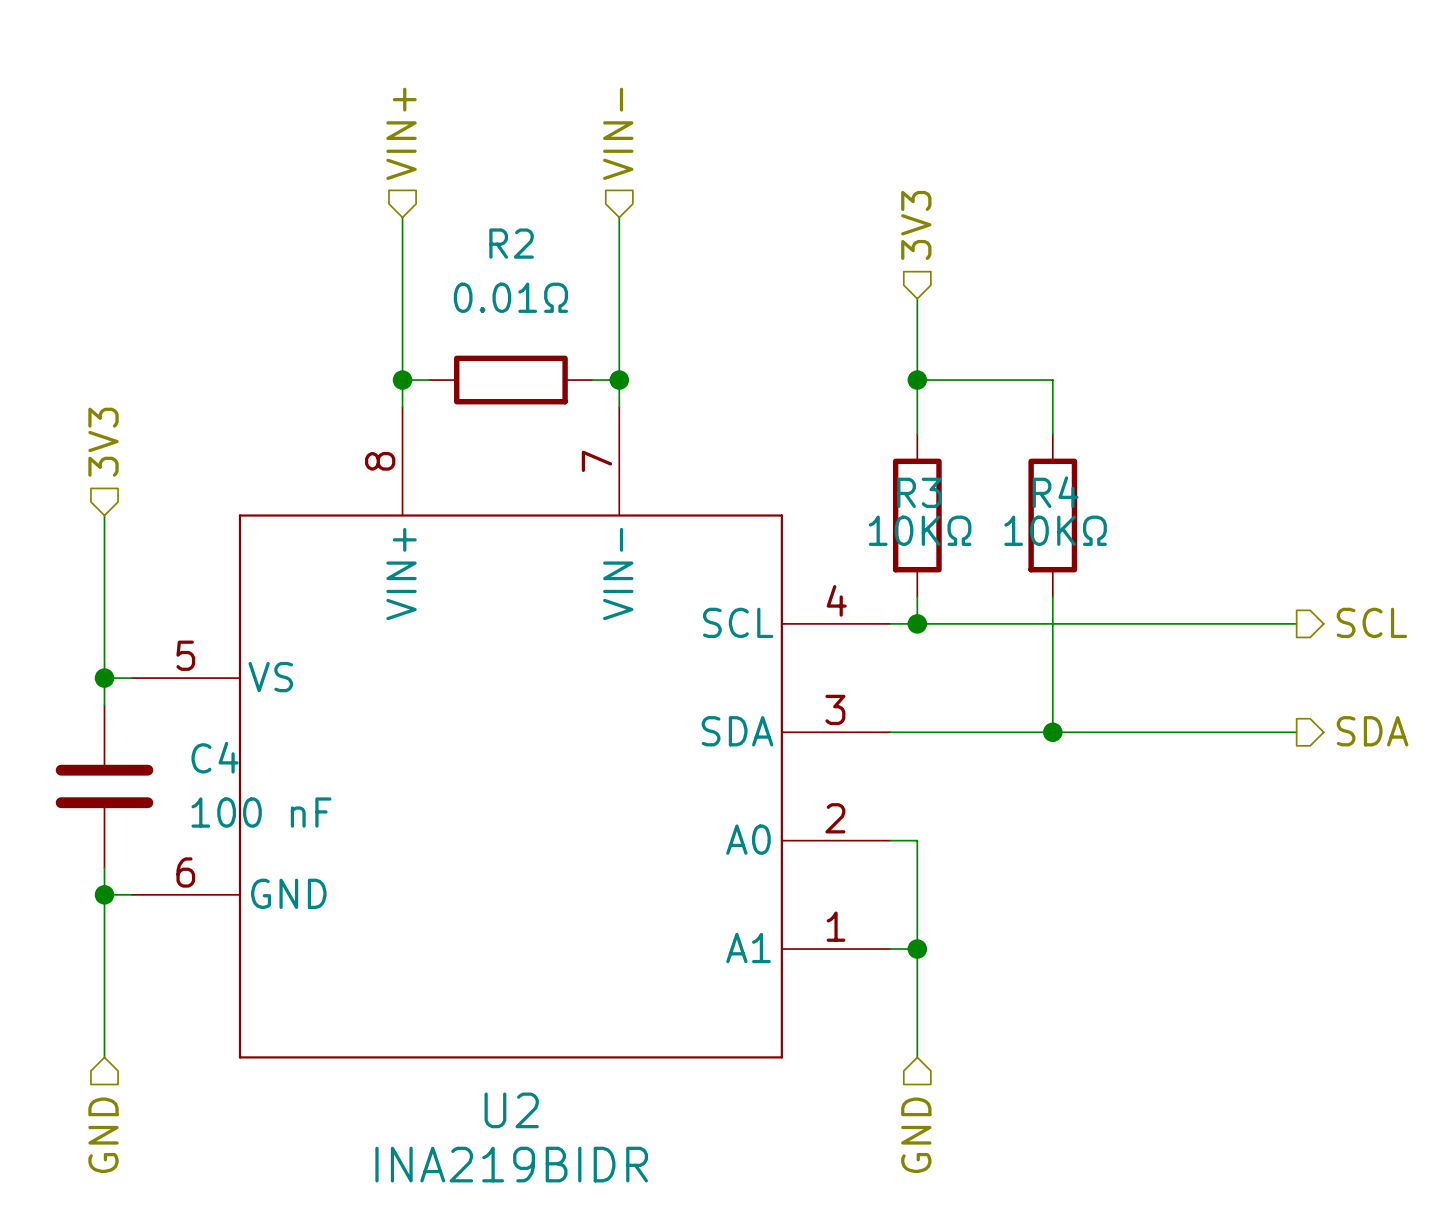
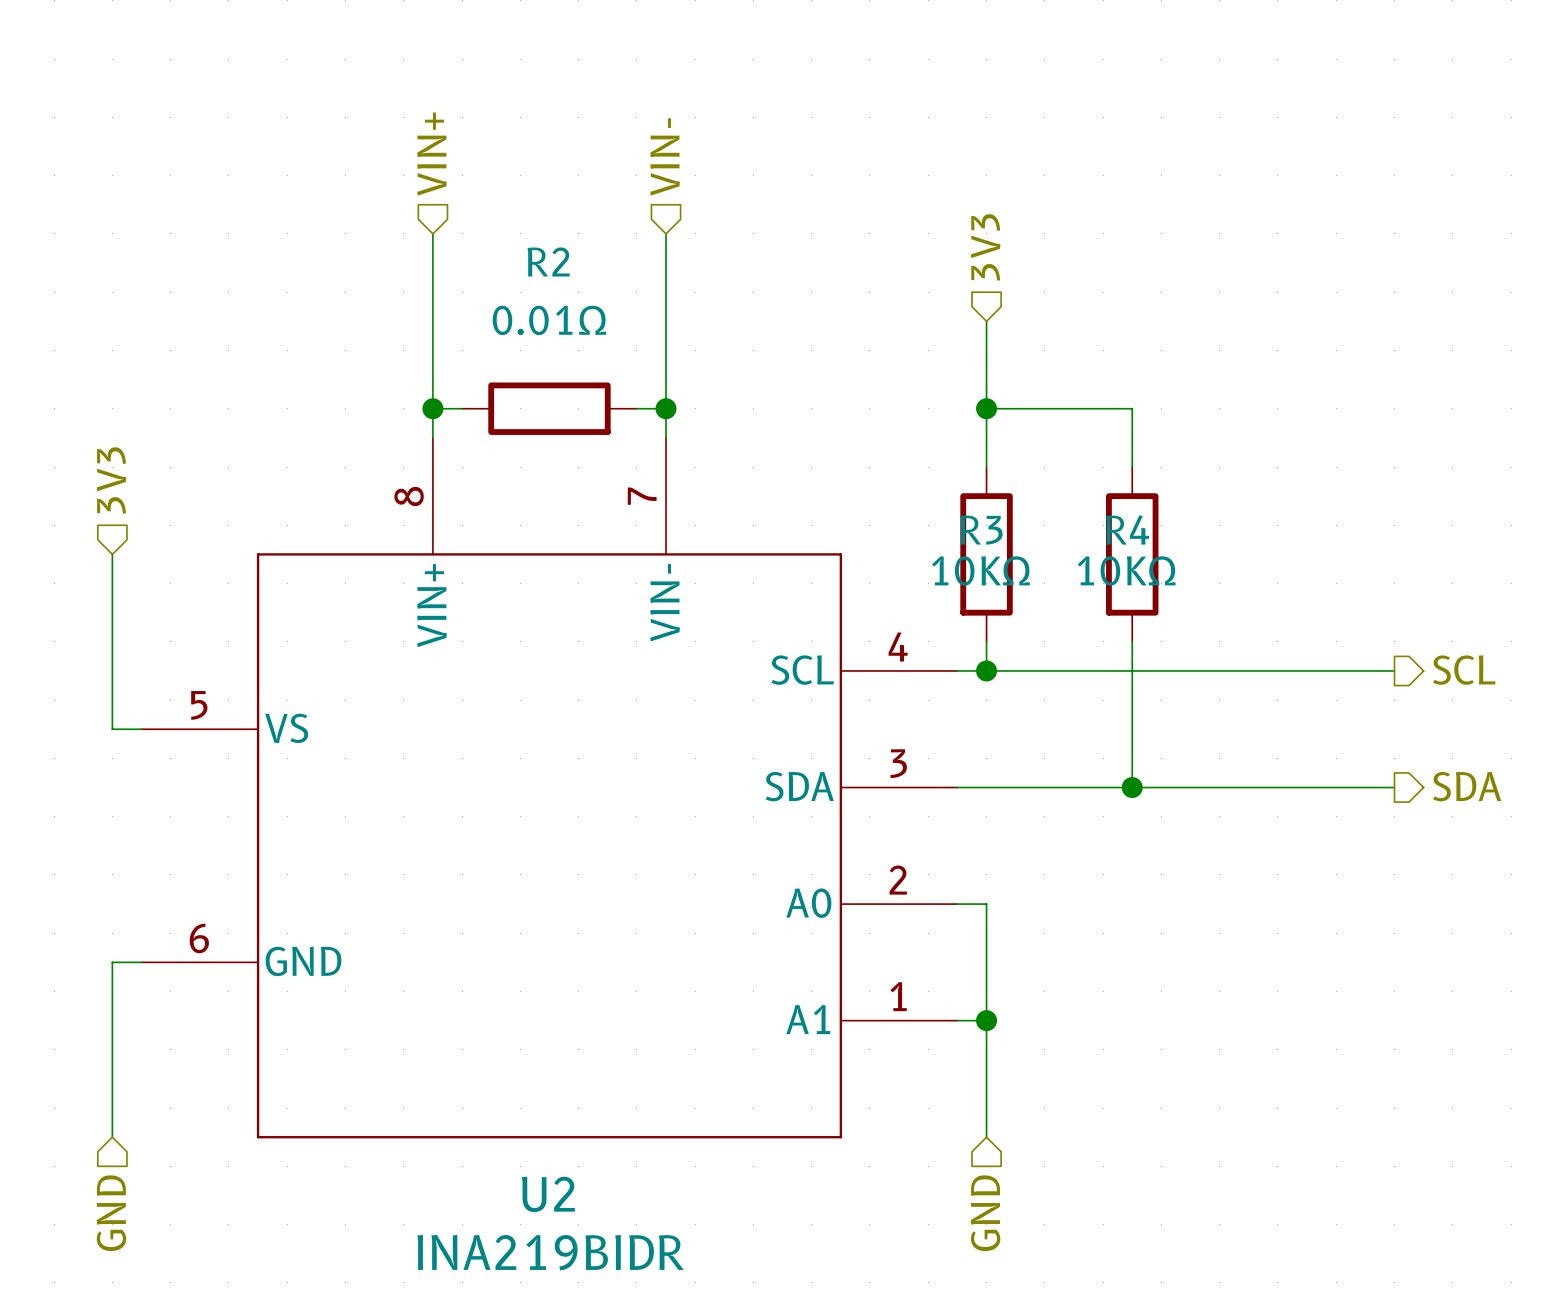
wire: (104, 678) (104, 705) -> none
junction: (104, 678) -> none
C4: 100 nF (104, 786) -> none
wire: (104, 867) (104, 894) -> none
junction: (104, 894) -> none

